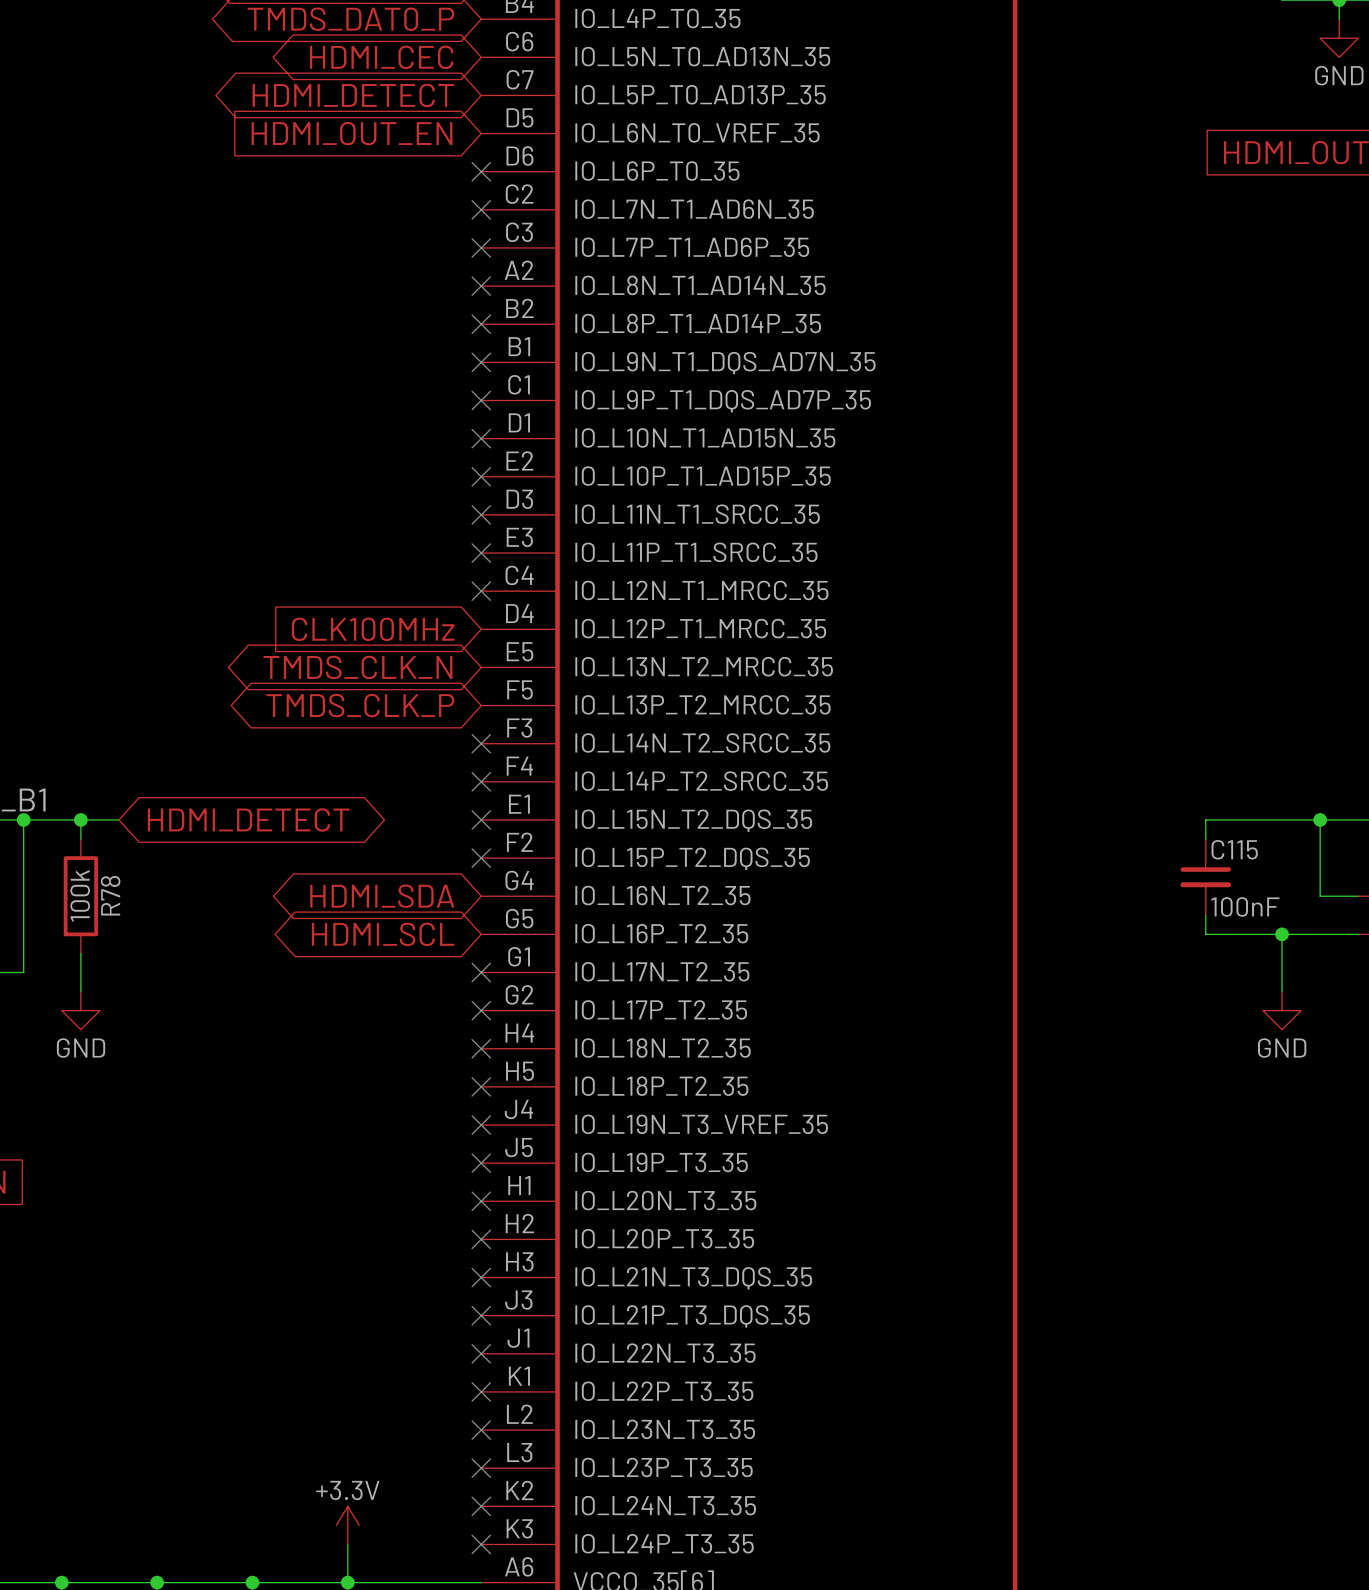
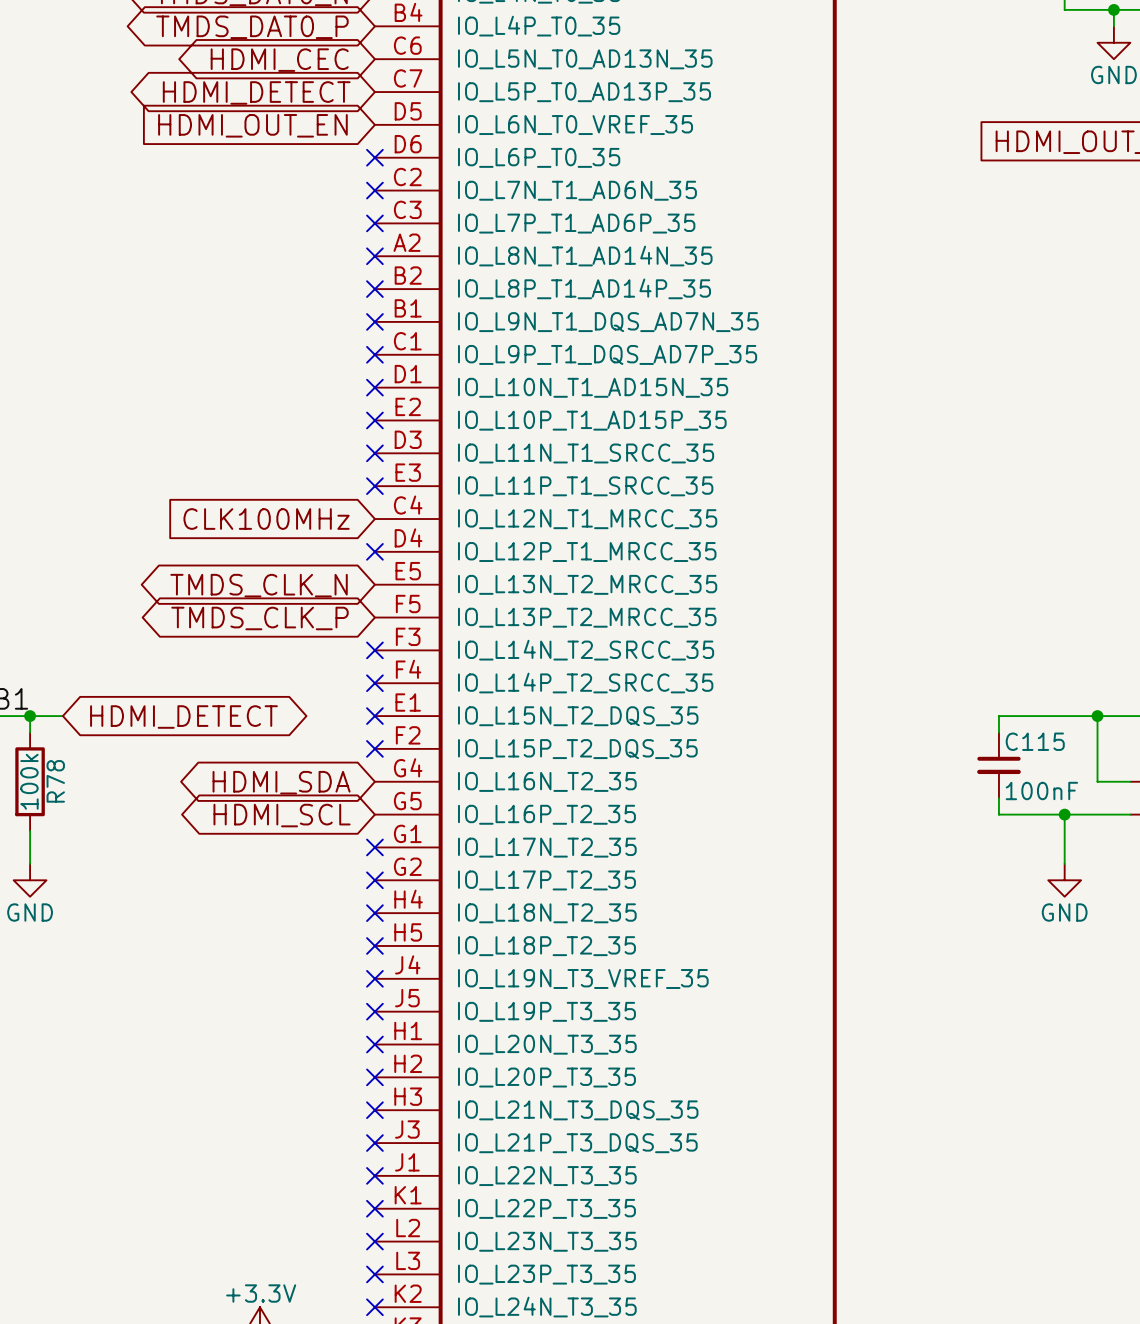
no-connect mark position: (481, 591) -> (374, 551)
global label position: CLK100MHz (373, 629) -> CLK100MHz (266, 519)

